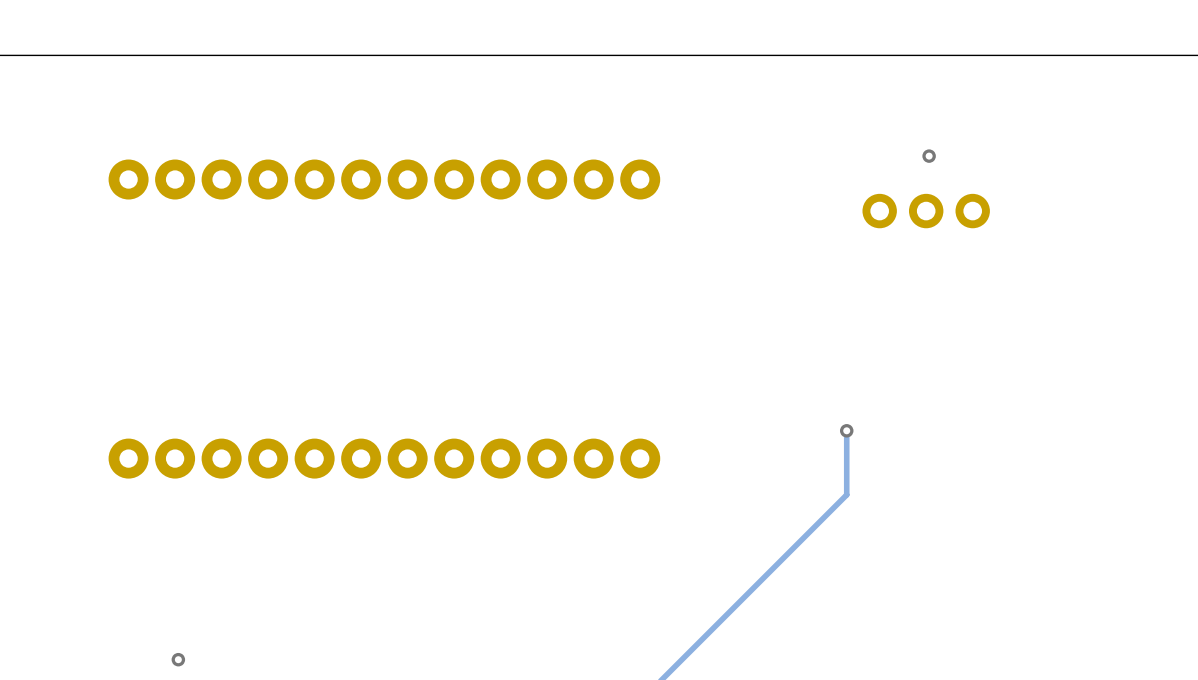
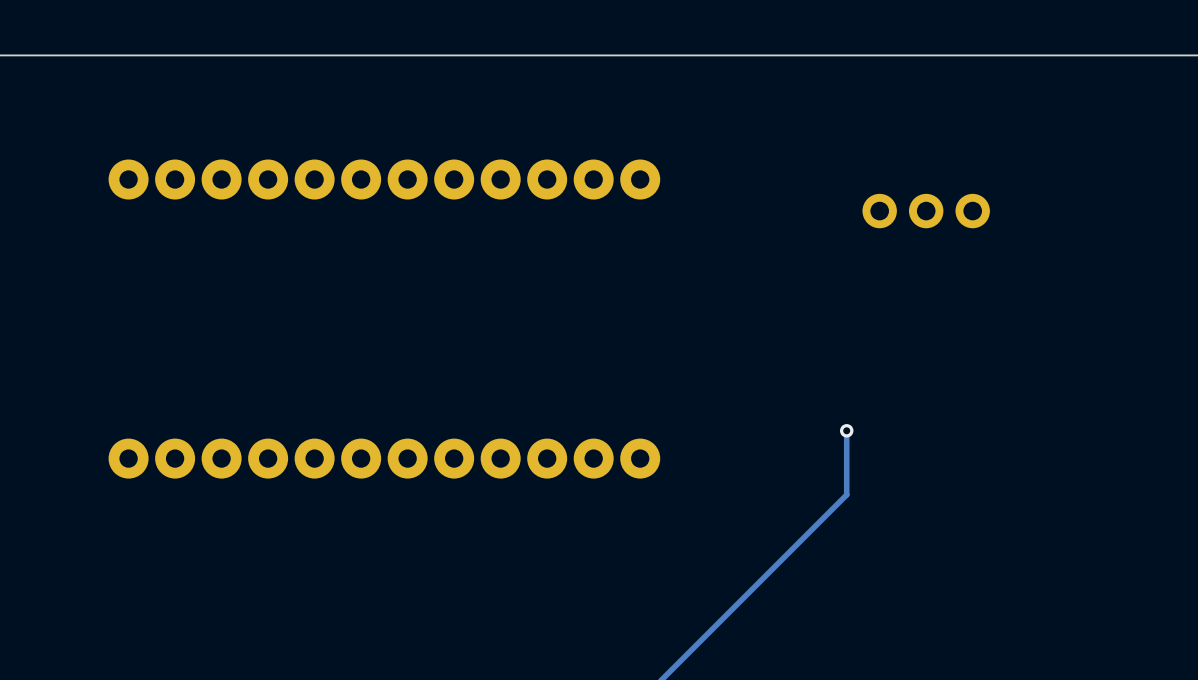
via: (929, 156) -> none
via: (178, 659) -> none

